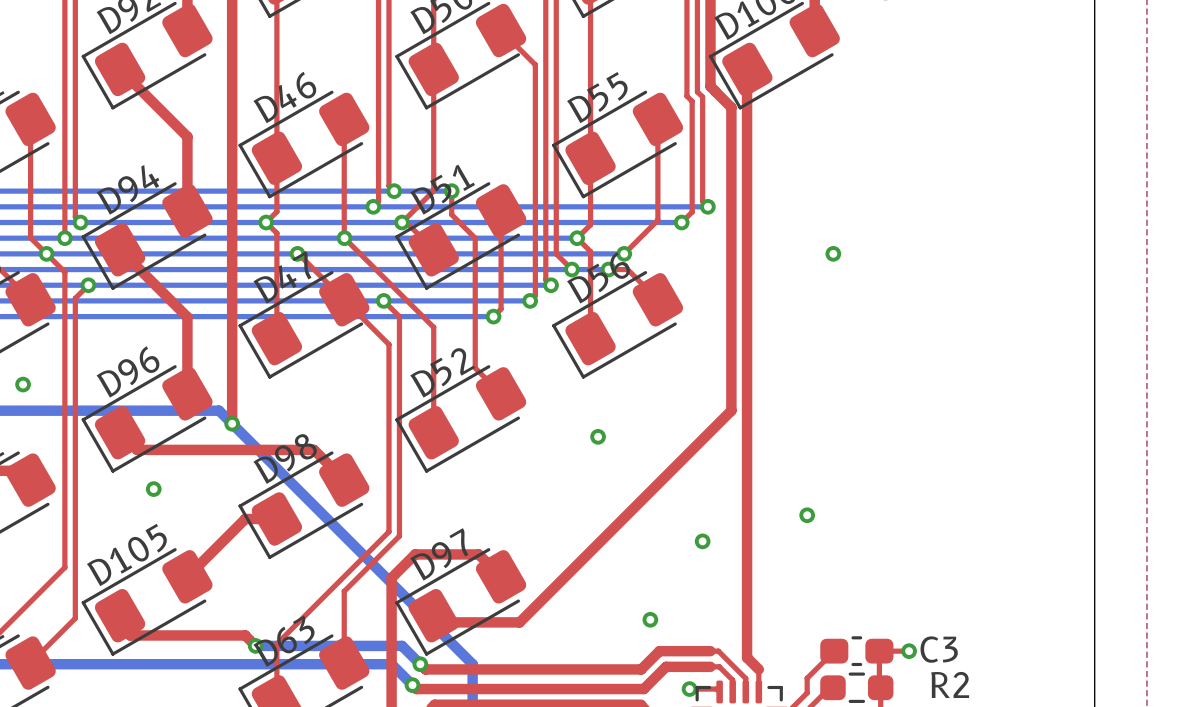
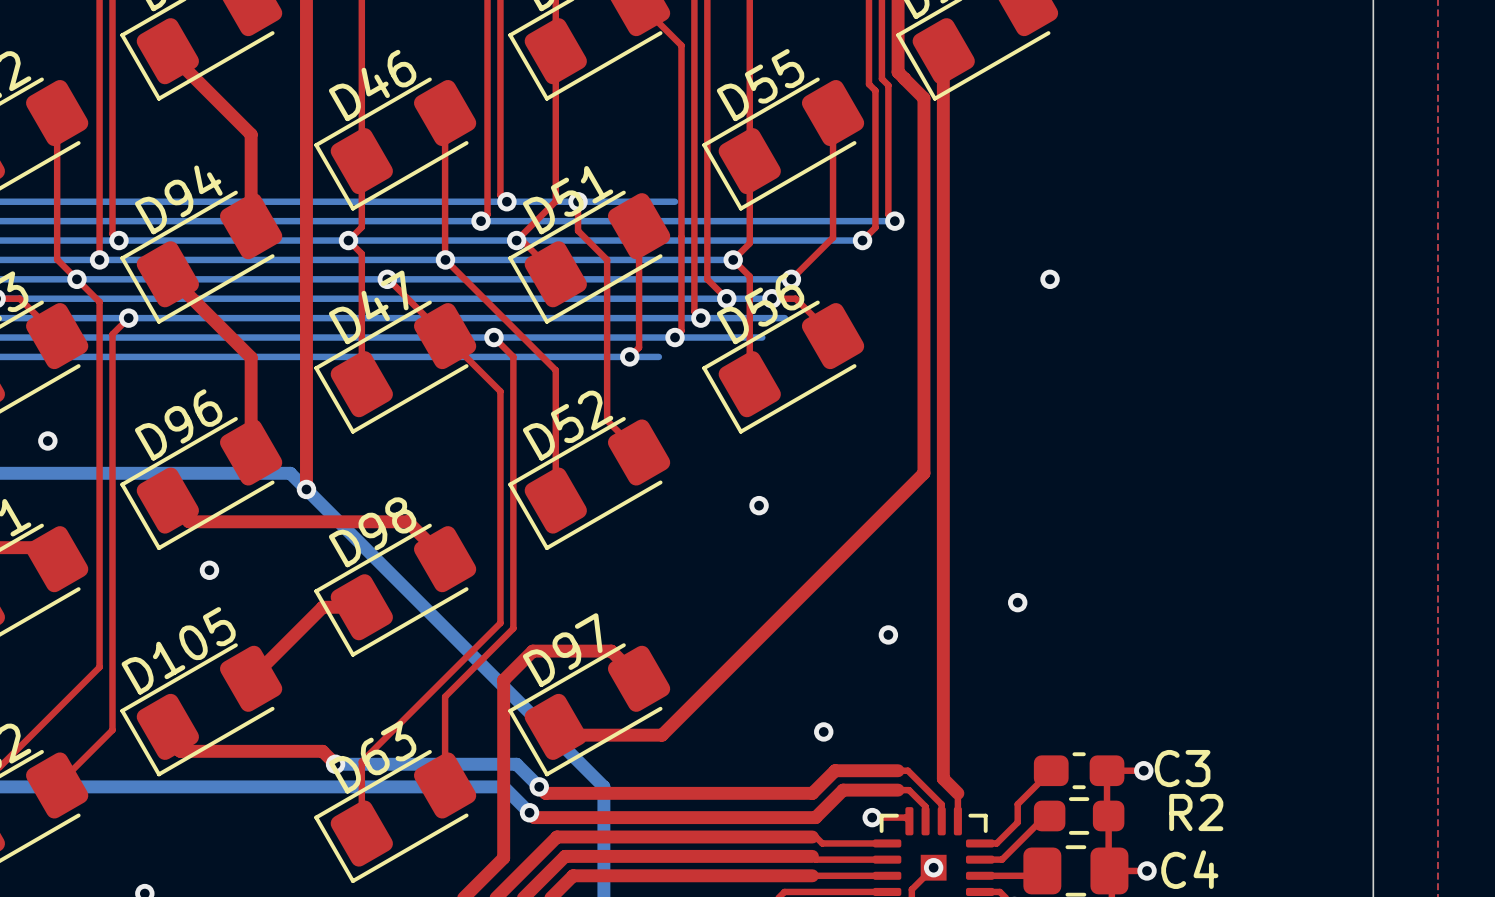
bottom track: none -> (578, 201) (675, 201)
bottom track: none -> (700, 318) (784, 318)
bottom track: none -> (675, 337) (762, 337)
bottom track: none -> (629, 356) (658, 356)

